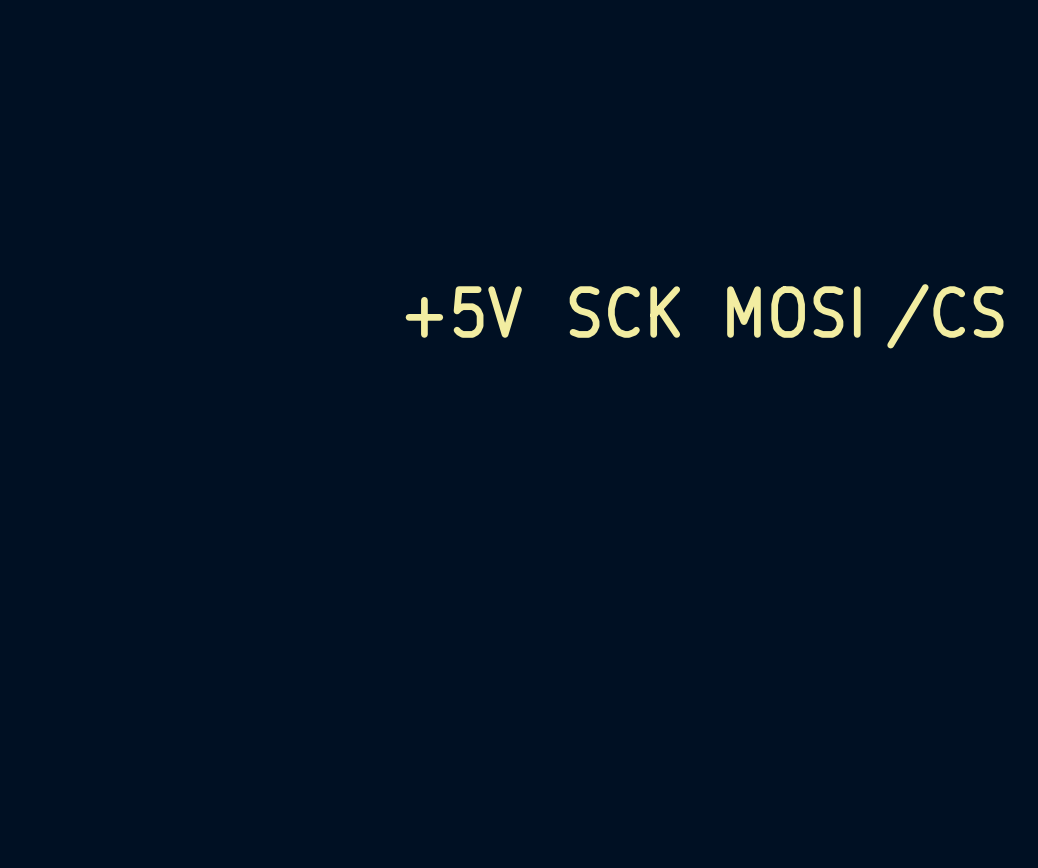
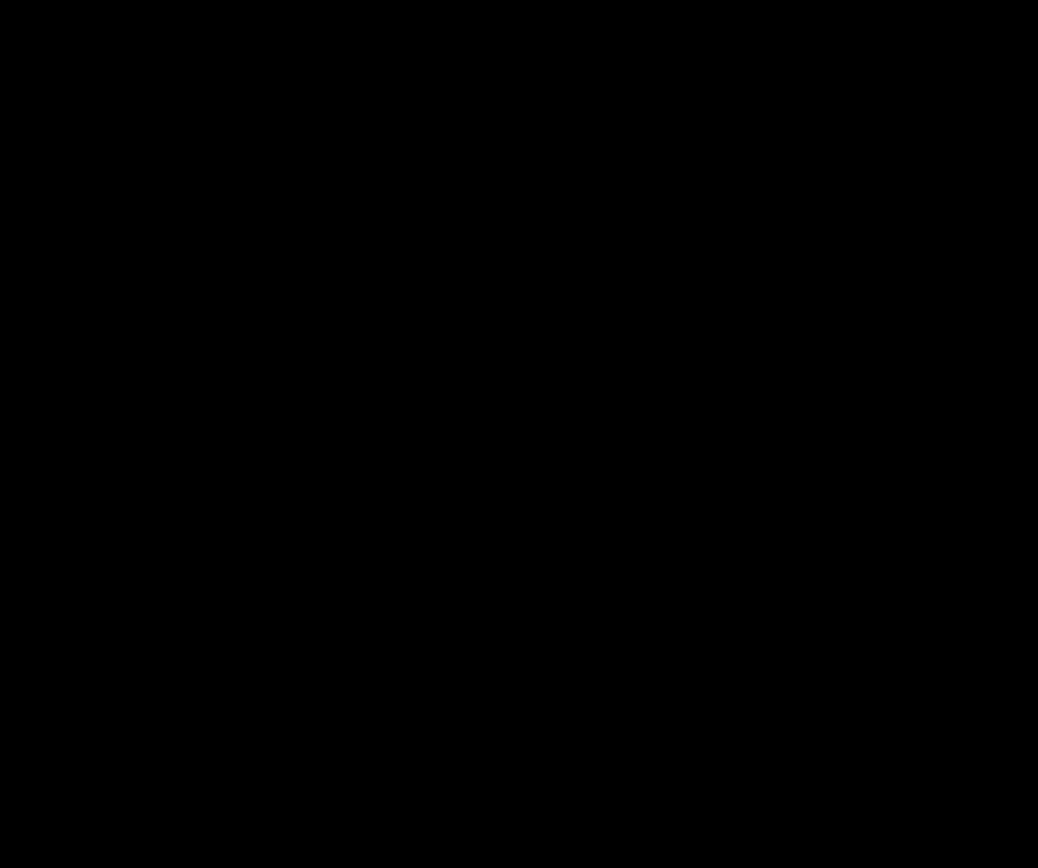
text: +5V (463, 312) -> none
text: SCK (624, 312) -> none
text: MOSI (793, 312) -> none
text: /CS (945, 316) -> none

